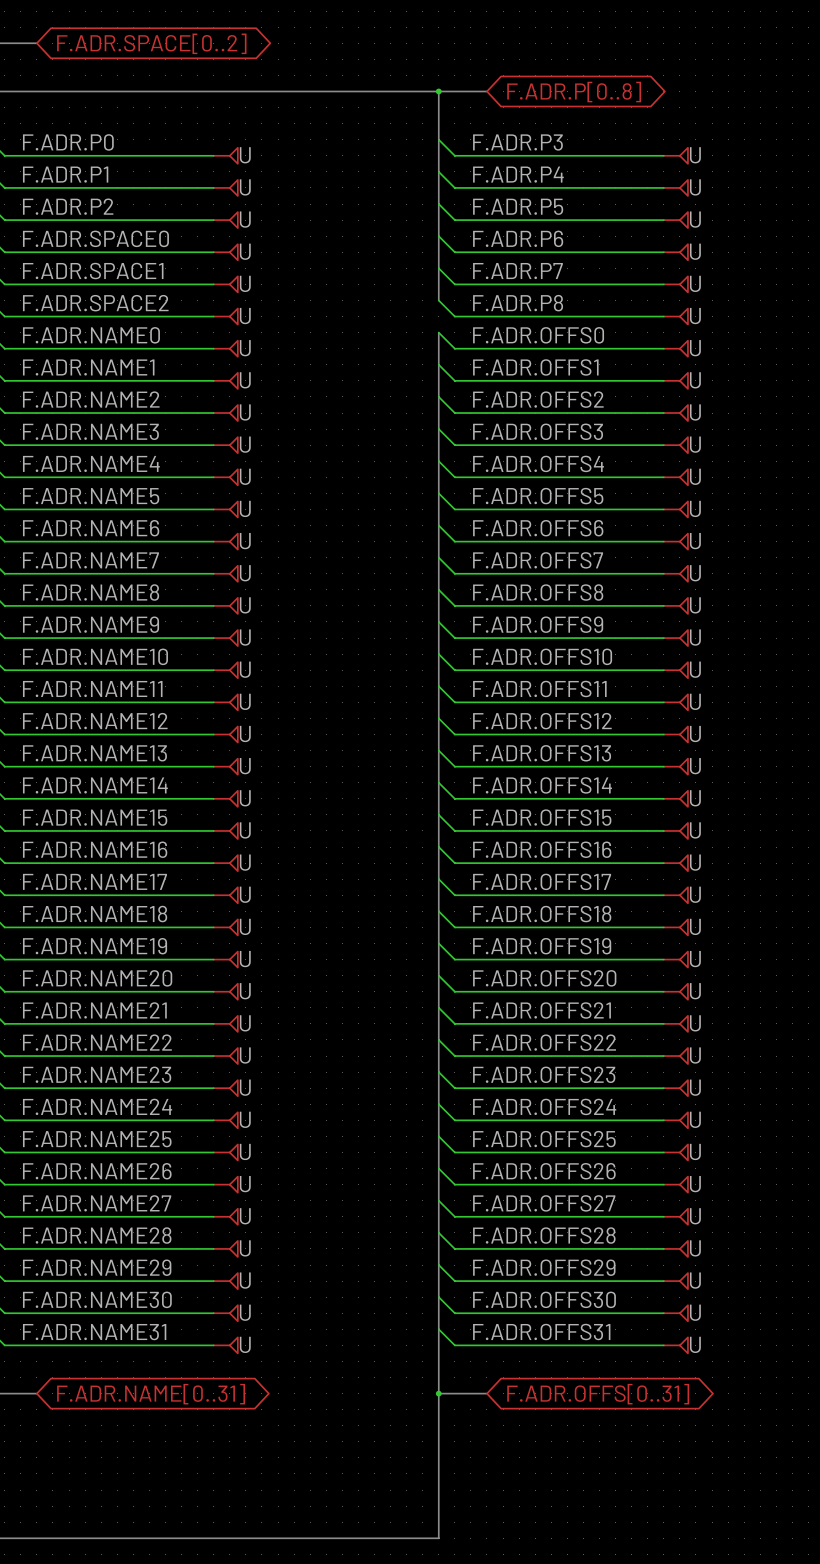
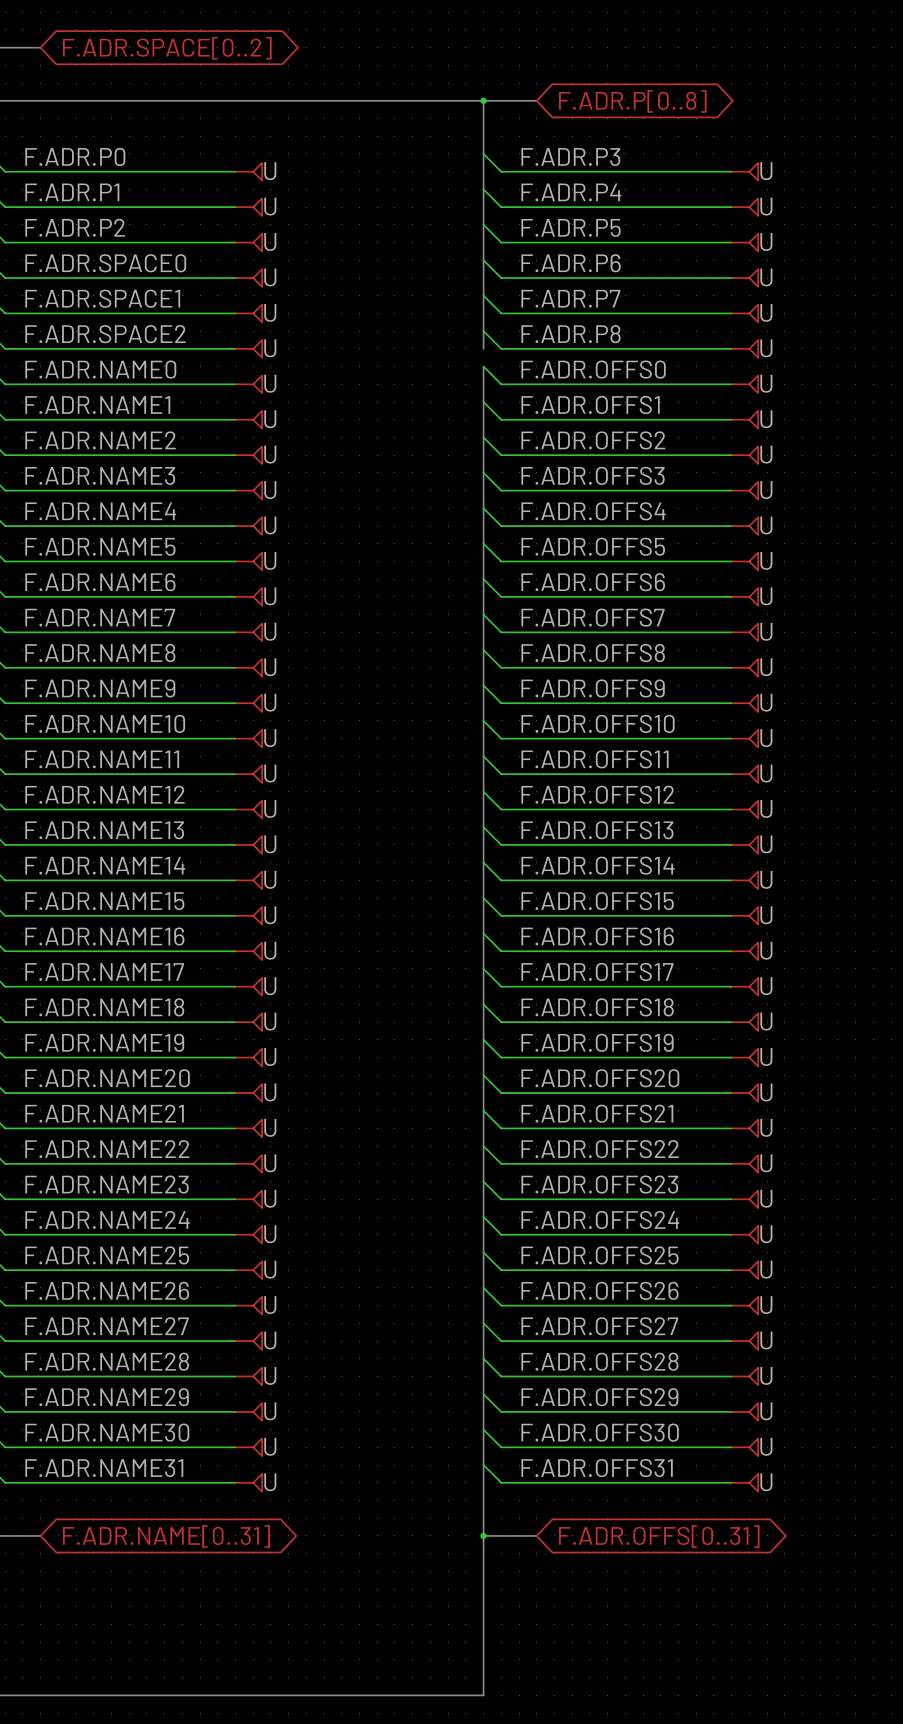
bus: none -> (483, 331) (483, 348)

